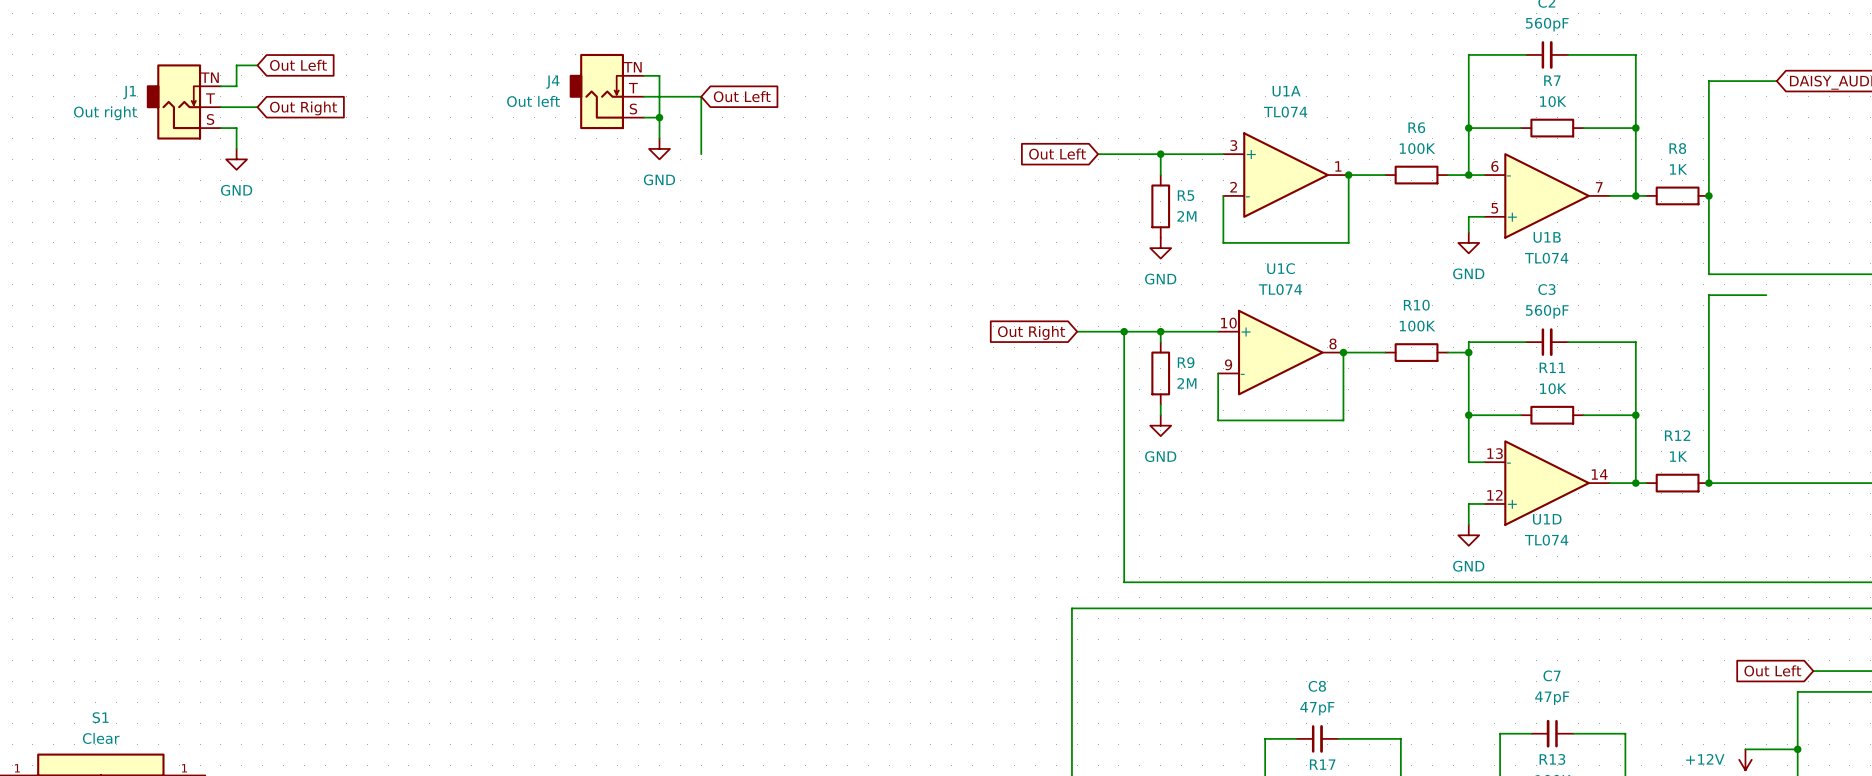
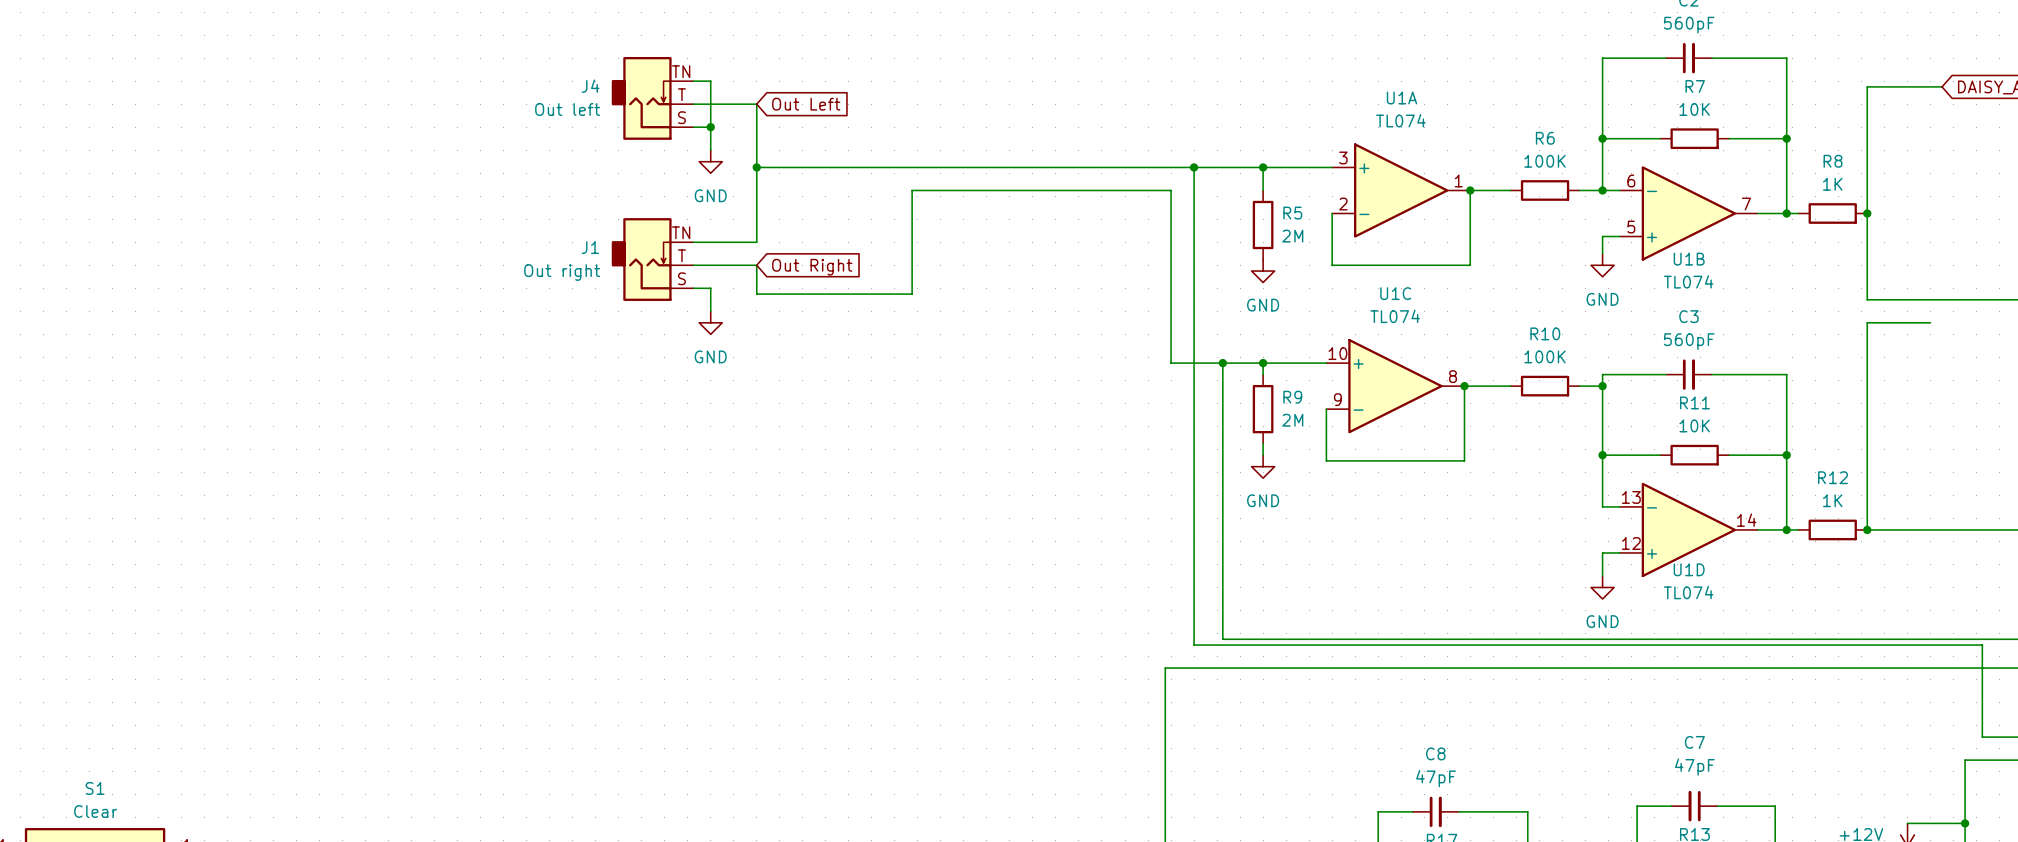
wire: (257, 65) (236, 65) (236, 86) (220, 86) -> none
global label: Out Left (298, 65) -> none
J1 position: (183, 101) -> (652, 259)
wire: (220, 107) (257, 107) -> none
global label: Out Right (303, 108) -> none
wire: (220, 128) (236, 128) (236, 148) -> none
junction: none -> (756, 167)
global label: Out Left (1057, 154) -> none
junction: none -> (1194, 167)
power symbol: GND (236, 159) -> none
wire: none -> (693, 242) (756, 242) (756, 167) (1194, 167) (1194, 645) (1982, 645) (1982, 737)
wire: none -> (693, 265) (756, 265) (756, 294) (912, 294) (912, 190) (1171, 190) (1171, 363)
global label: none -> Out Right (812, 267)
wire: none -> (693, 288) (710, 288) (710, 311)
power symbol: none -> GND (710, 322)
global label: Out Right (1031, 332) -> none
global label: Out Left (1772, 670) -> none

